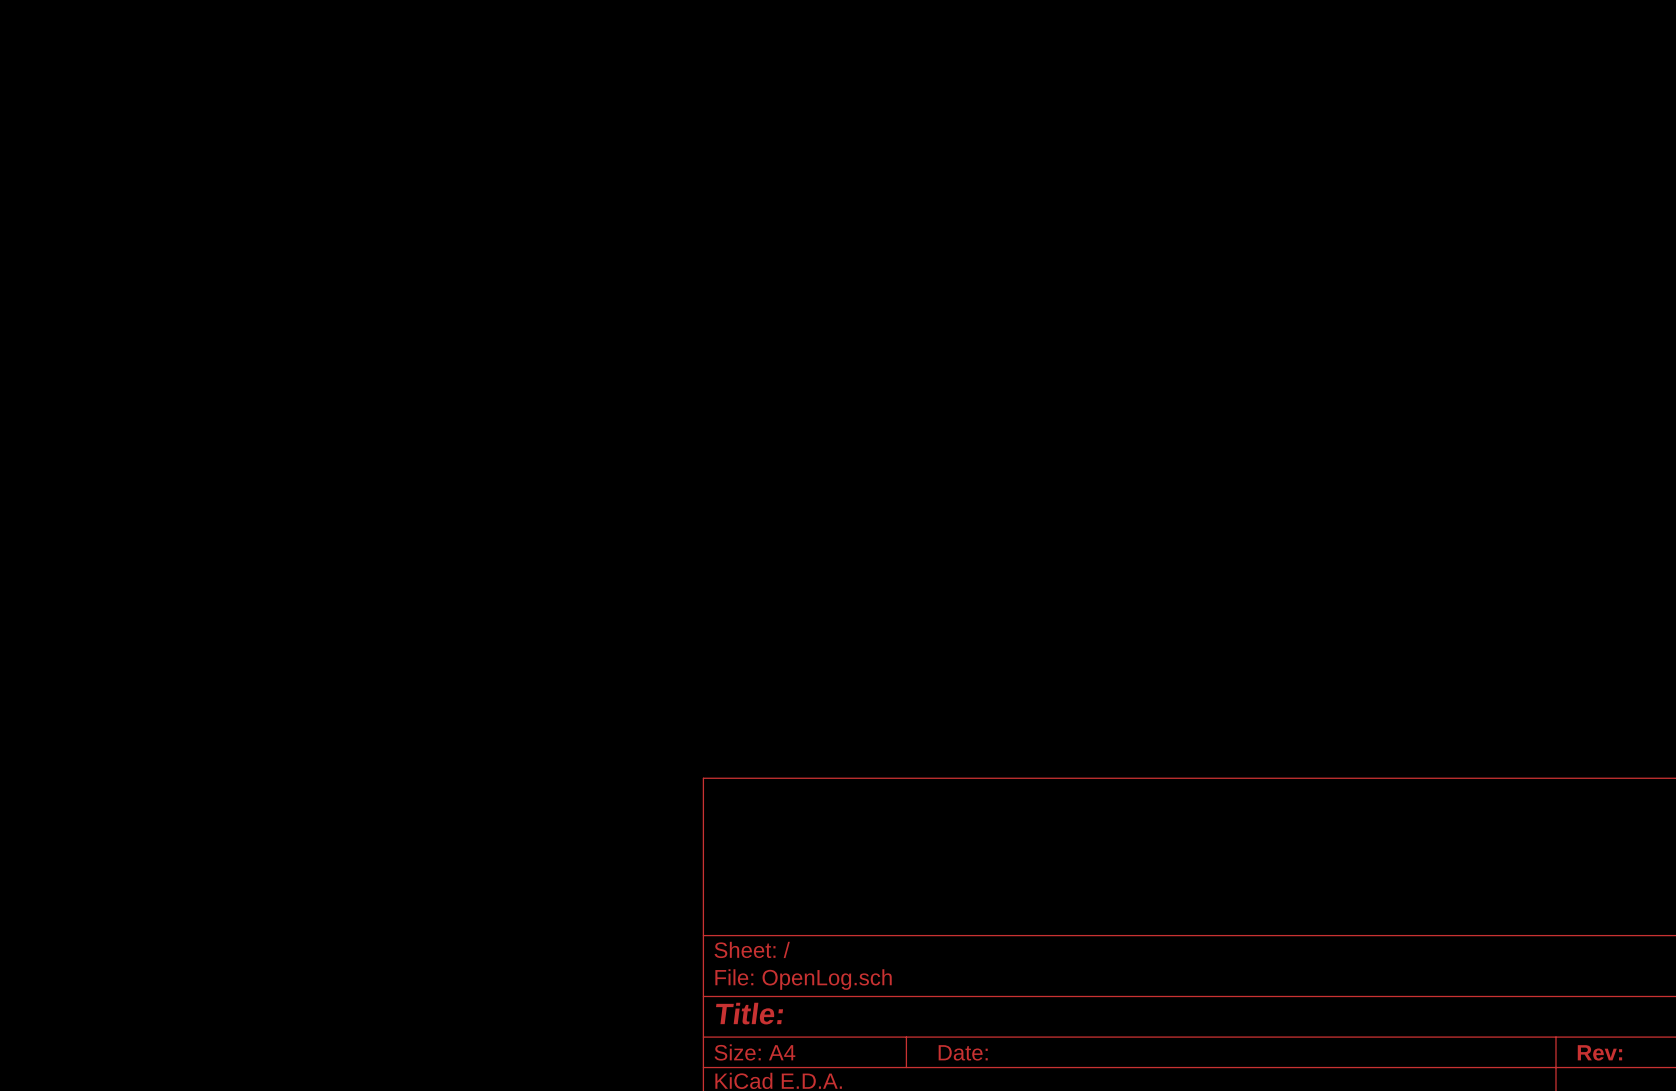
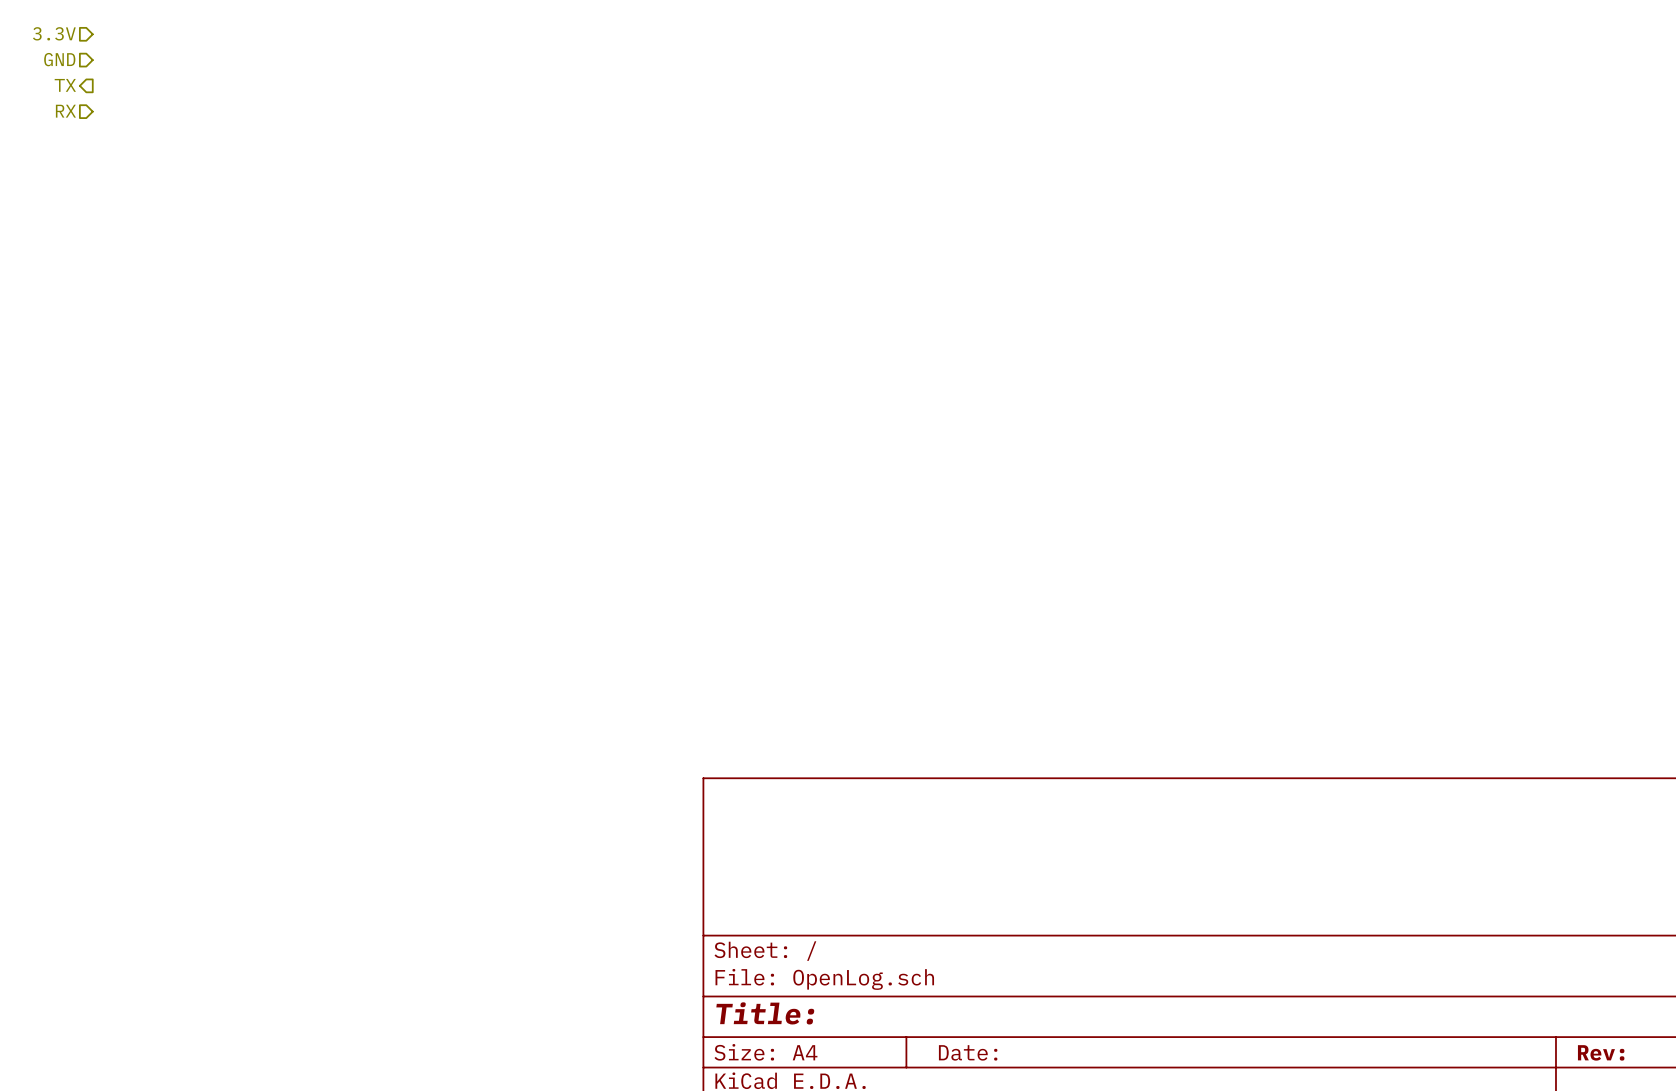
hierarchical label: none -> 3.3V (54, 33)
hierarchical label: none -> GND (59, 59)
hierarchical label: none -> TX (65, 85)
hierarchical label: none -> RX (65, 111)

